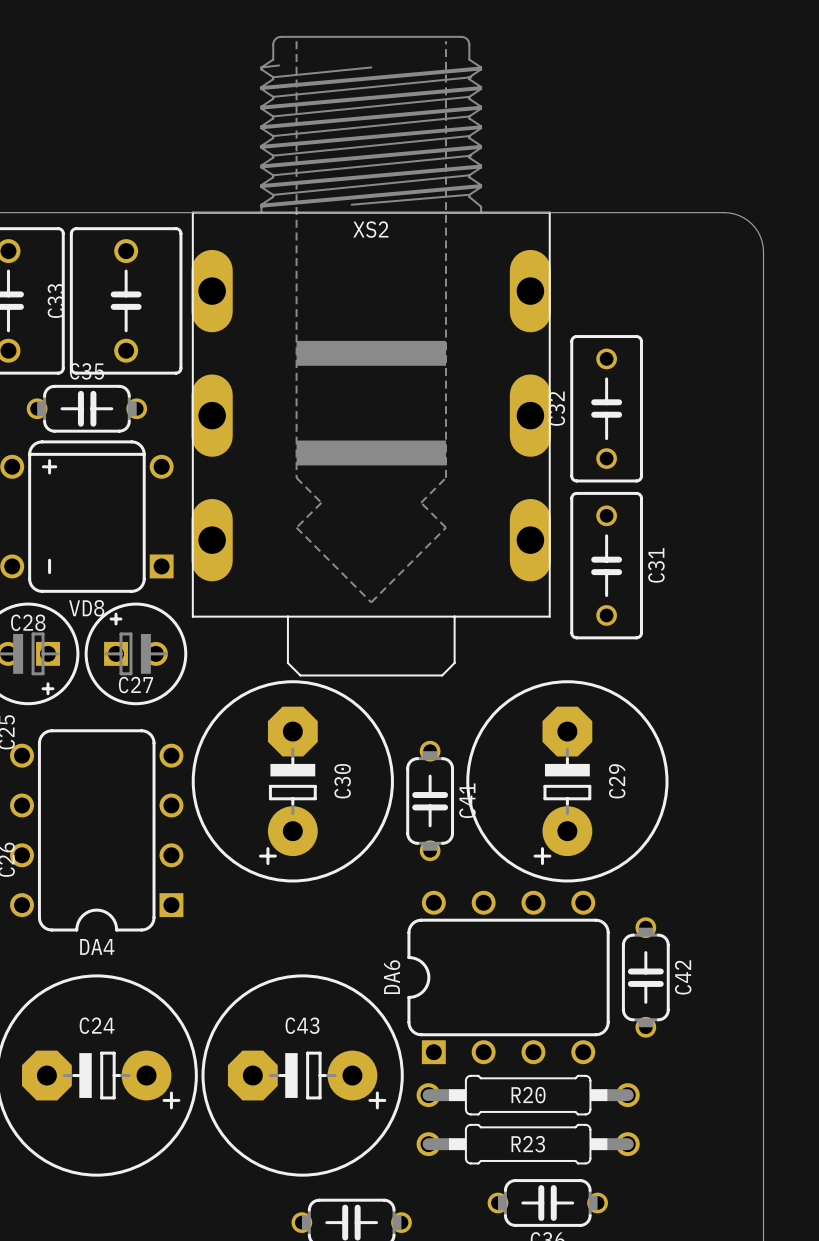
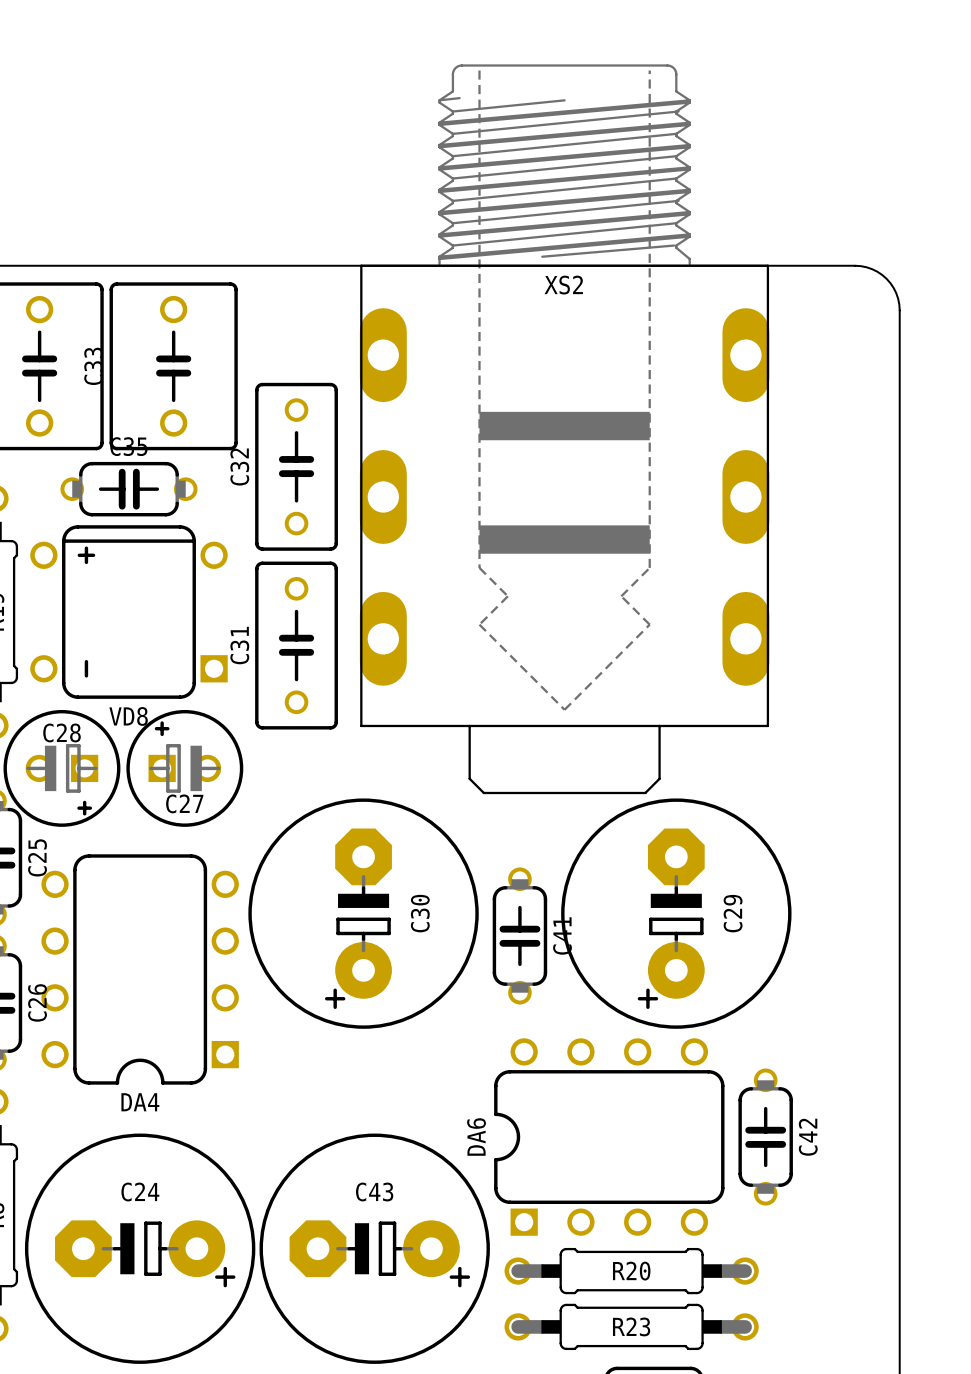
XS2 position: (371, 356) -> (564, 429)
C32 position: (606, 408) -> (296, 466)
C31 rotation: 0° (606, 565) -> 180° (296, 645)
C31 position: (606, 565) -> (296, 645)

